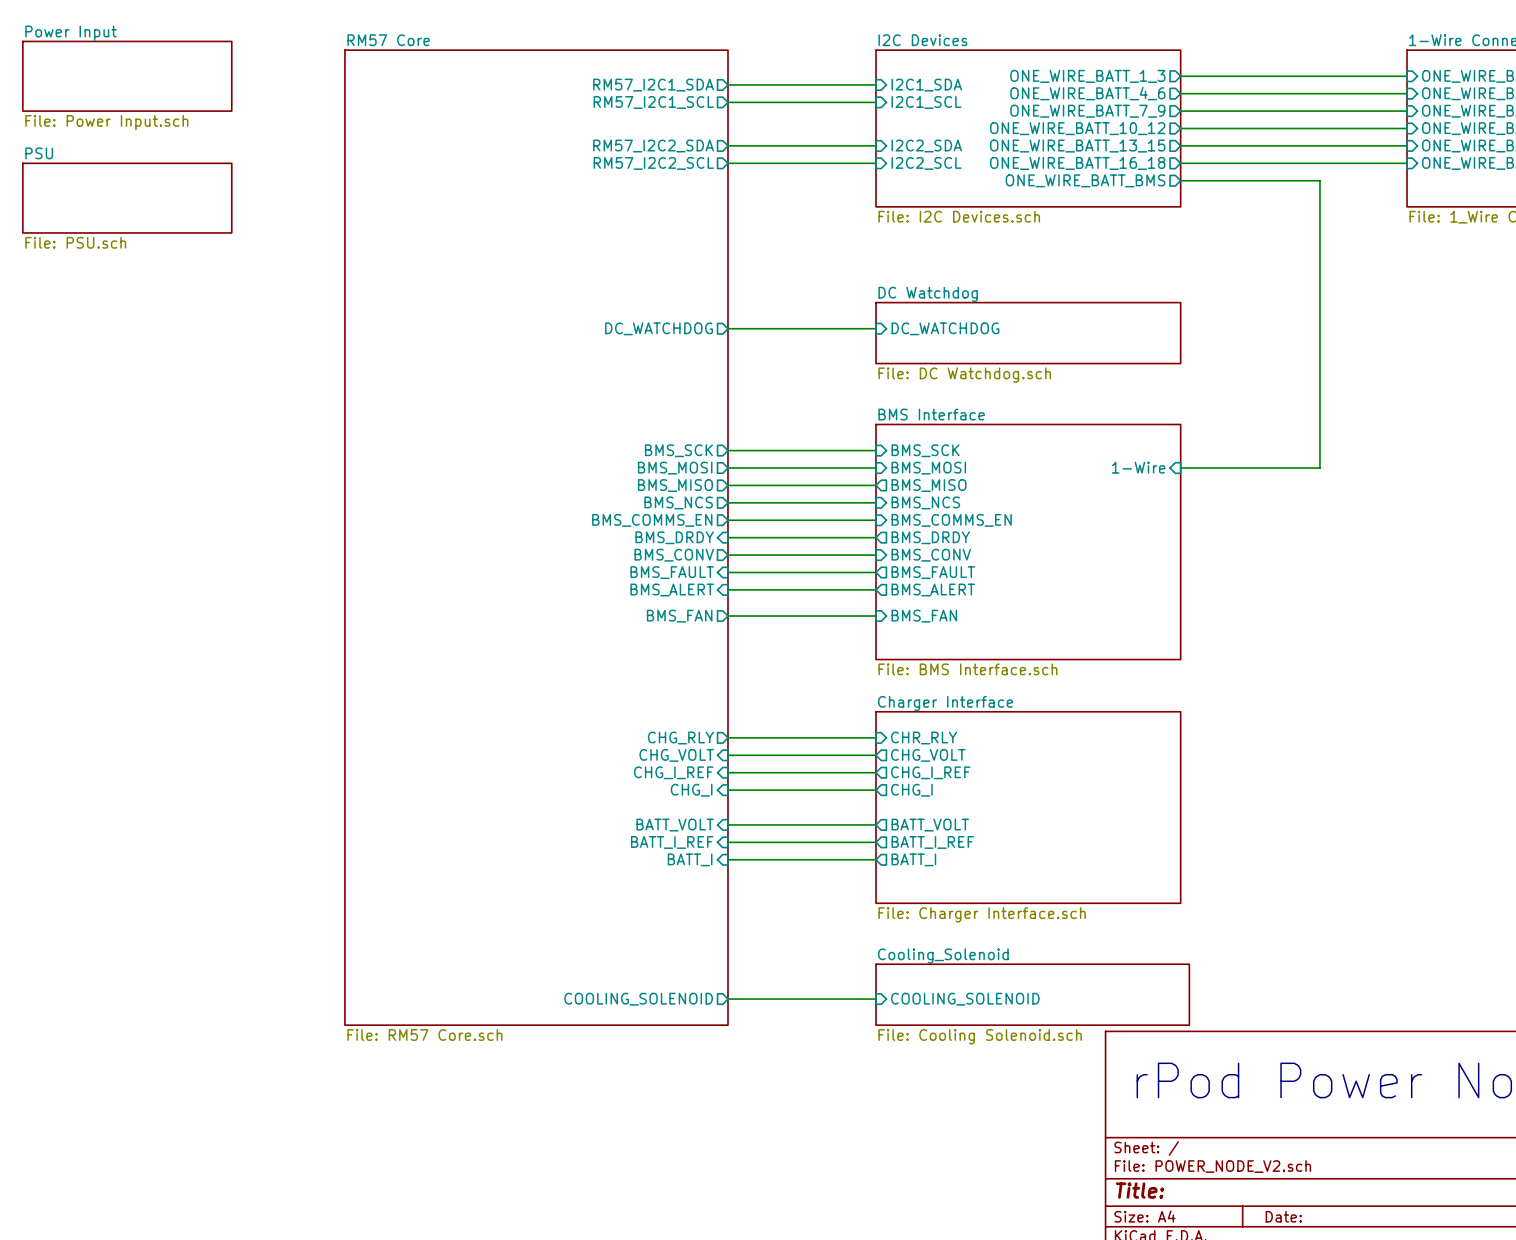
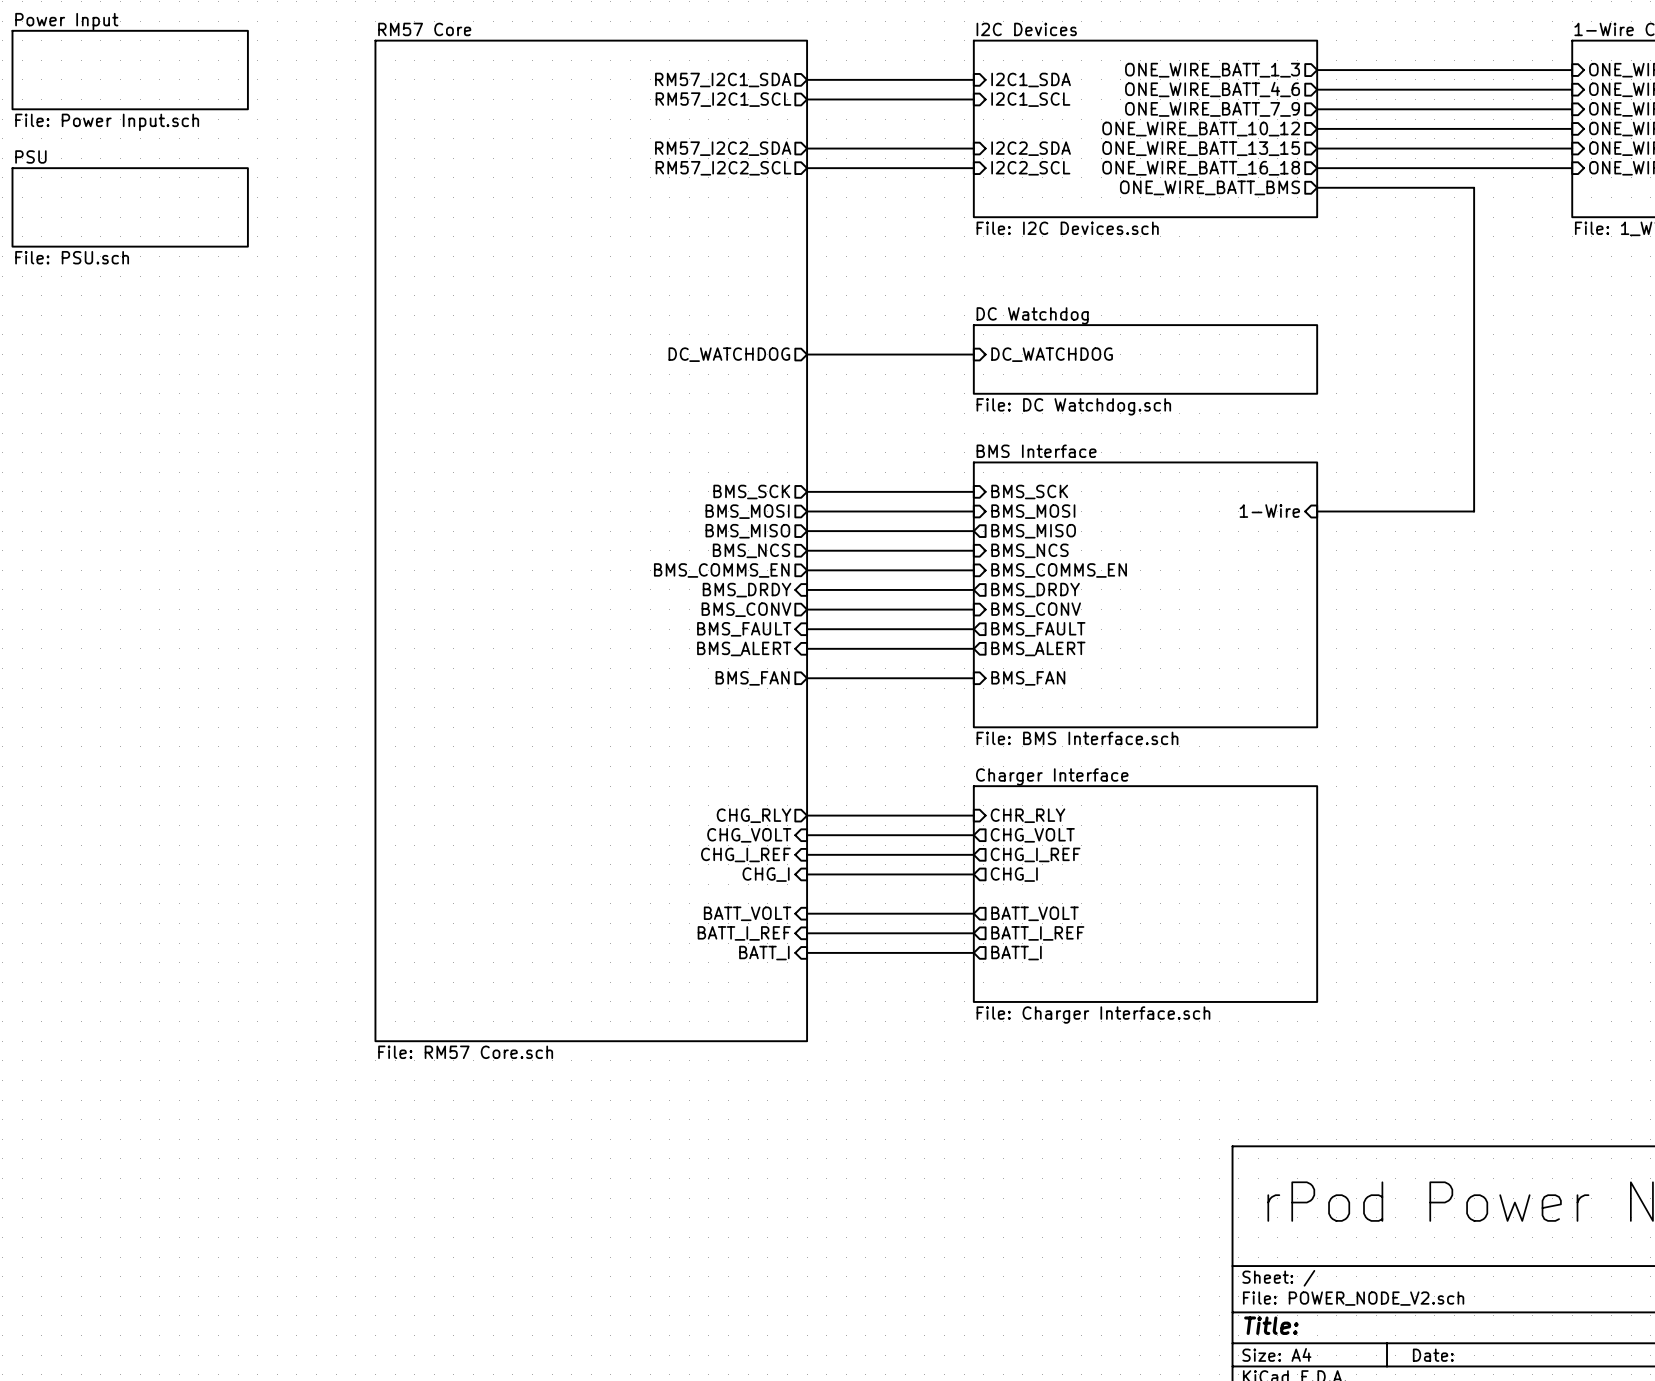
sheet RM57 Core shape: [344, 50, 728, 1026] -> [375, 40, 808, 1042]
sheet Cooling_Solenoid: File: Cooling Solenoid.sch (1032, 994) -> none
sheet pin: COOLING_SOLENOID (638, 999) -> none
wire: (727, 999) (875, 999) -> none
sheet pin: COOLING_SOLENOID (965, 999) -> none
sheet RM57 Core value position: File: RM57 Core.sch (424, 1035) -> File: RM57 Core.sch (465, 1052)

